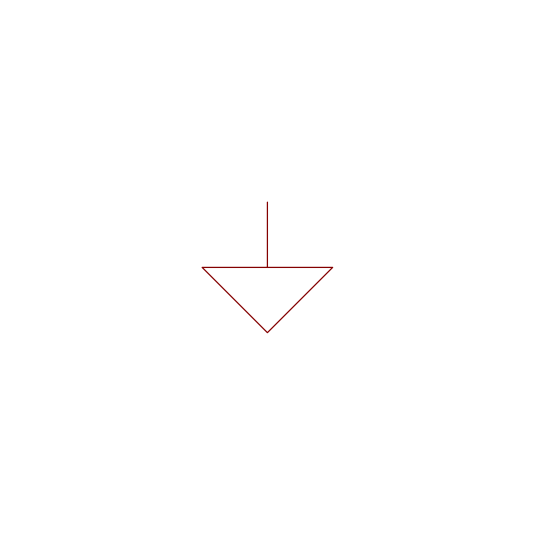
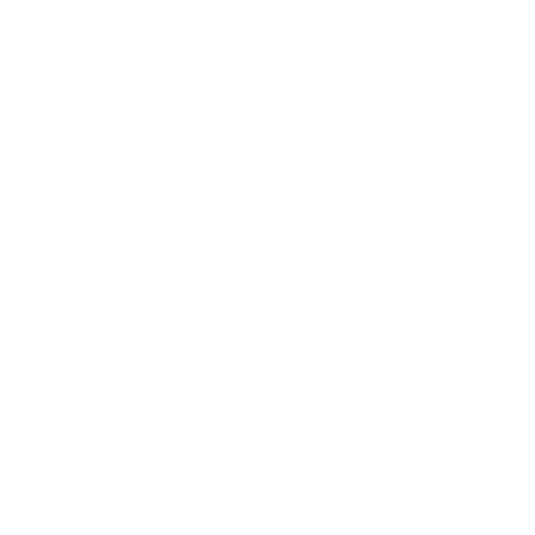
power symbol: (267, 267) -> none

